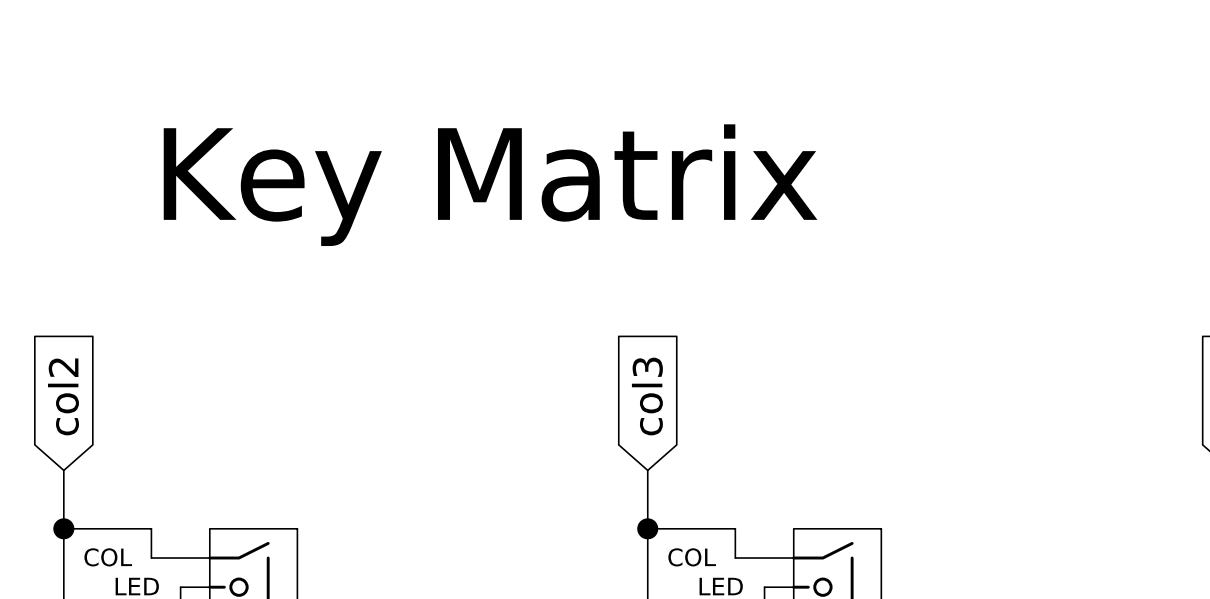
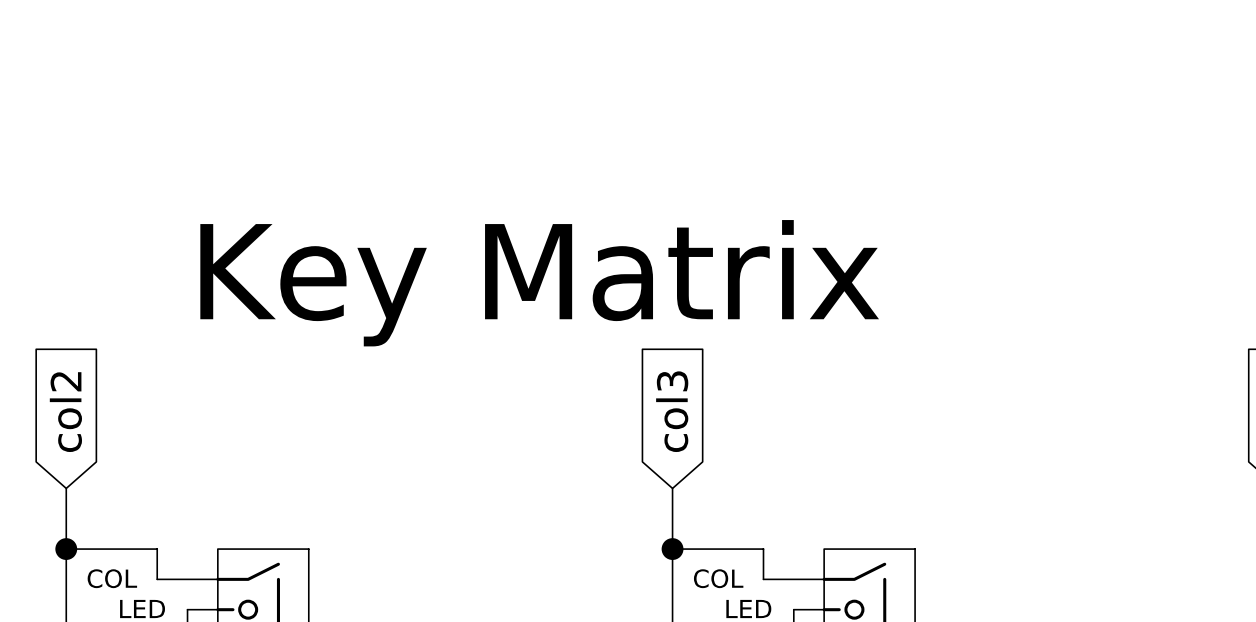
text position: Key Matrix (490, 185) -> Key Matrix (539, 283)

